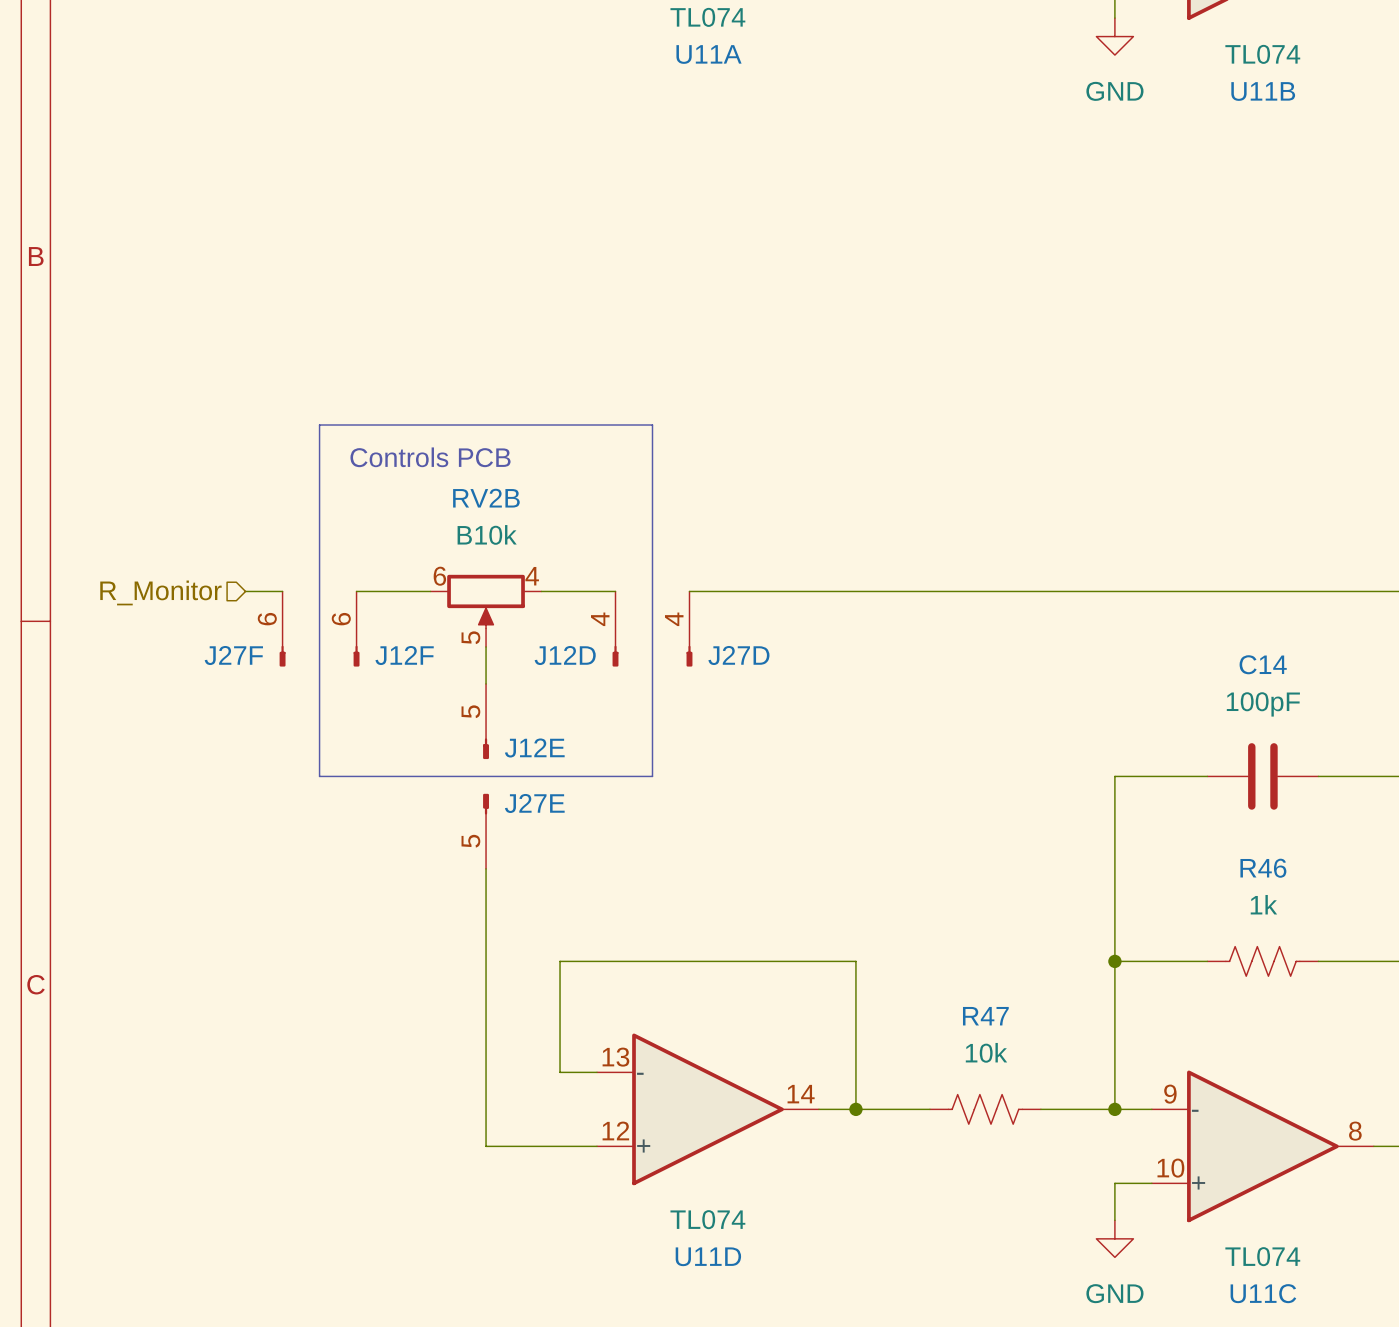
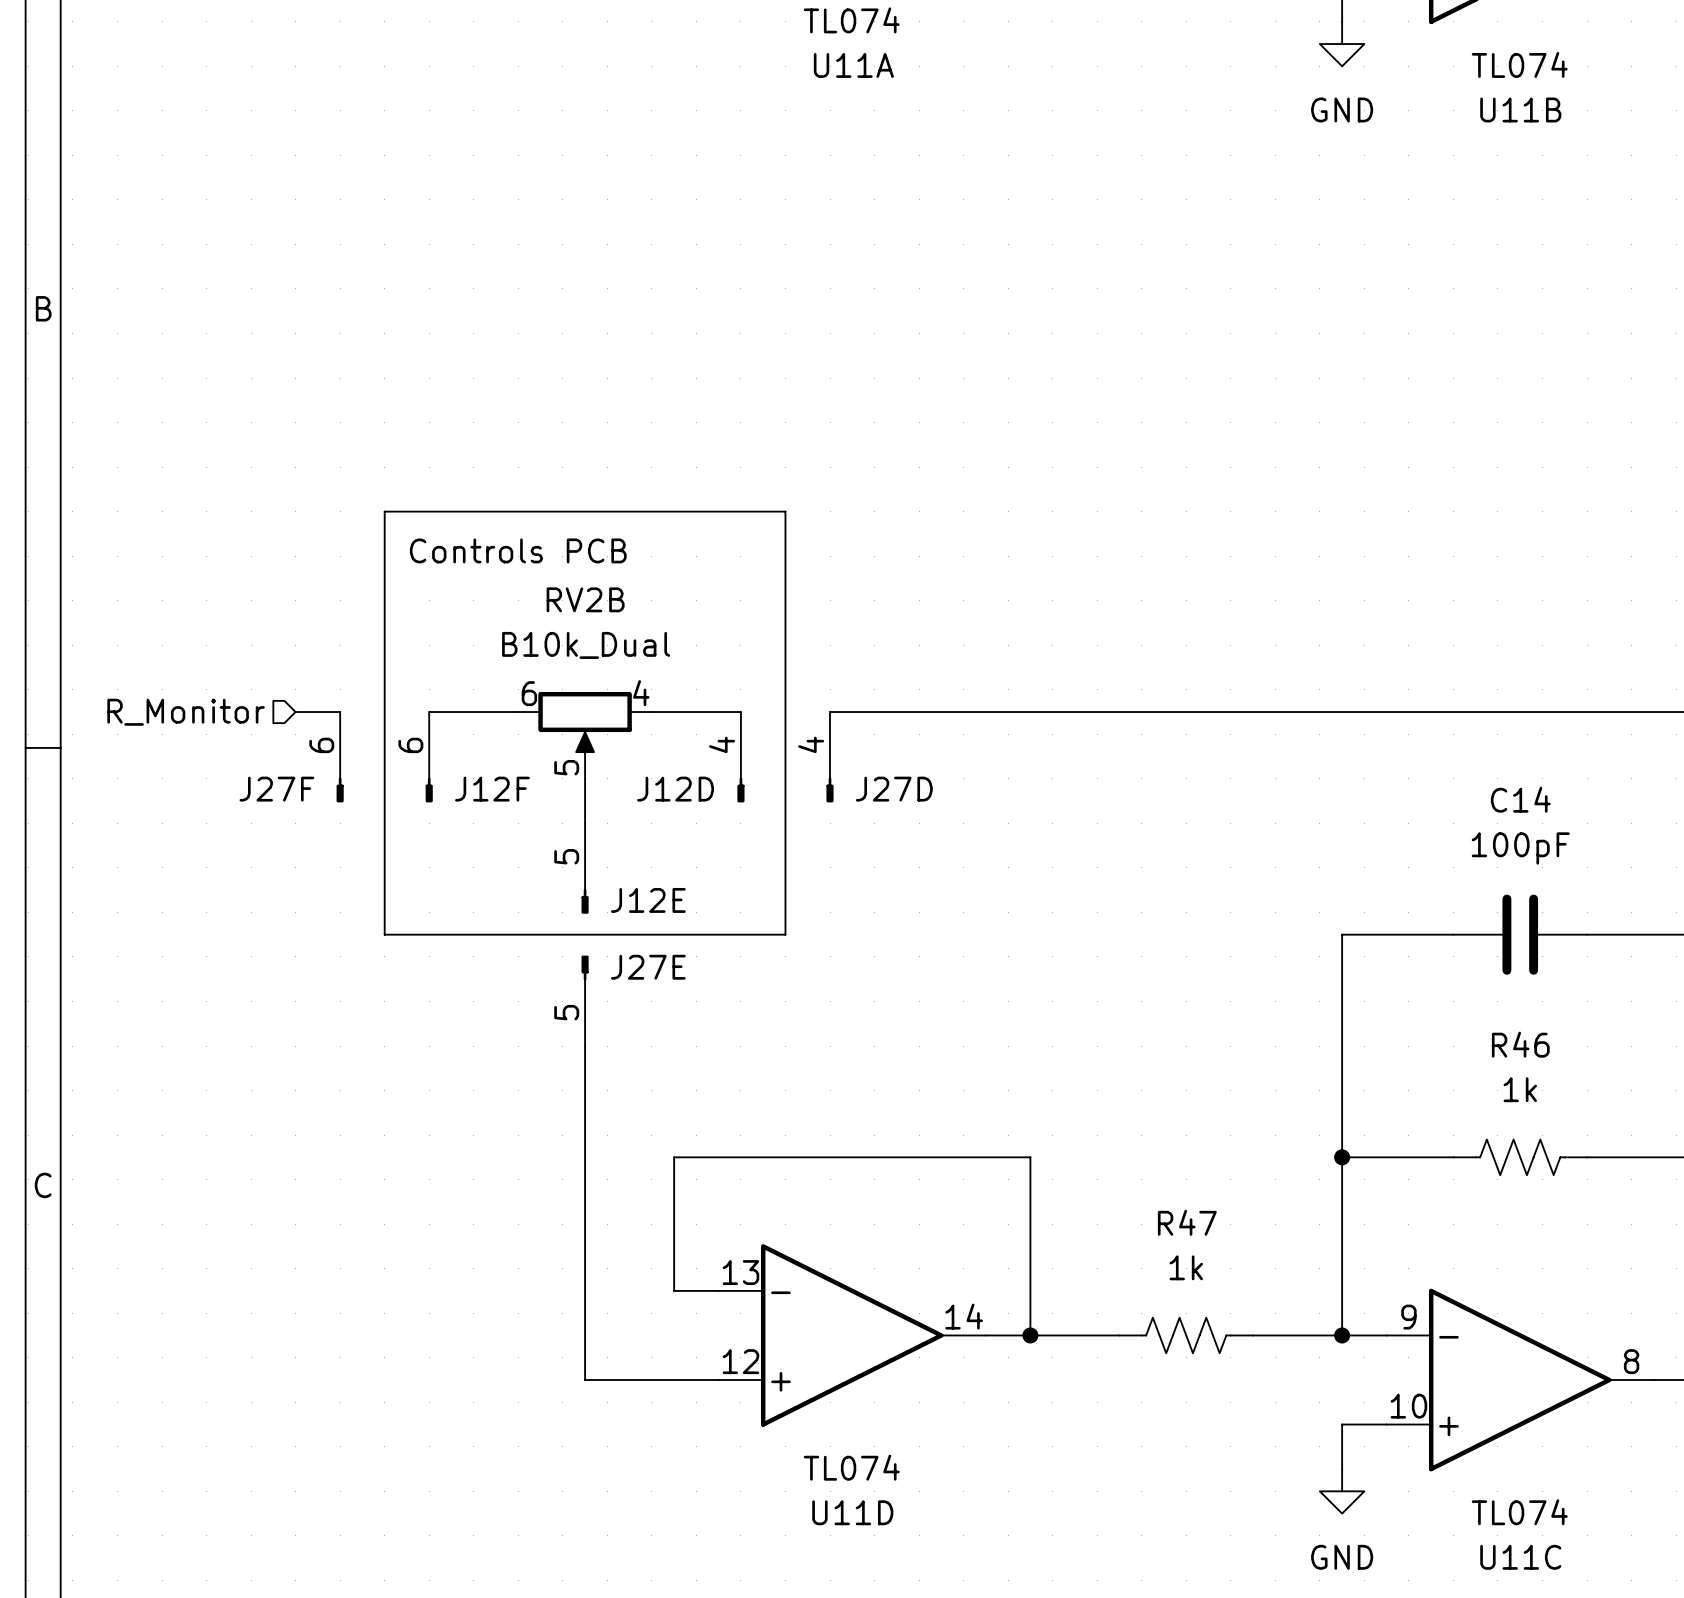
RV2B value: B10k (487, 534) -> B10k_Dual (586, 645)
R47 value: 10k (986, 1052) -> 1k (1186, 1267)

